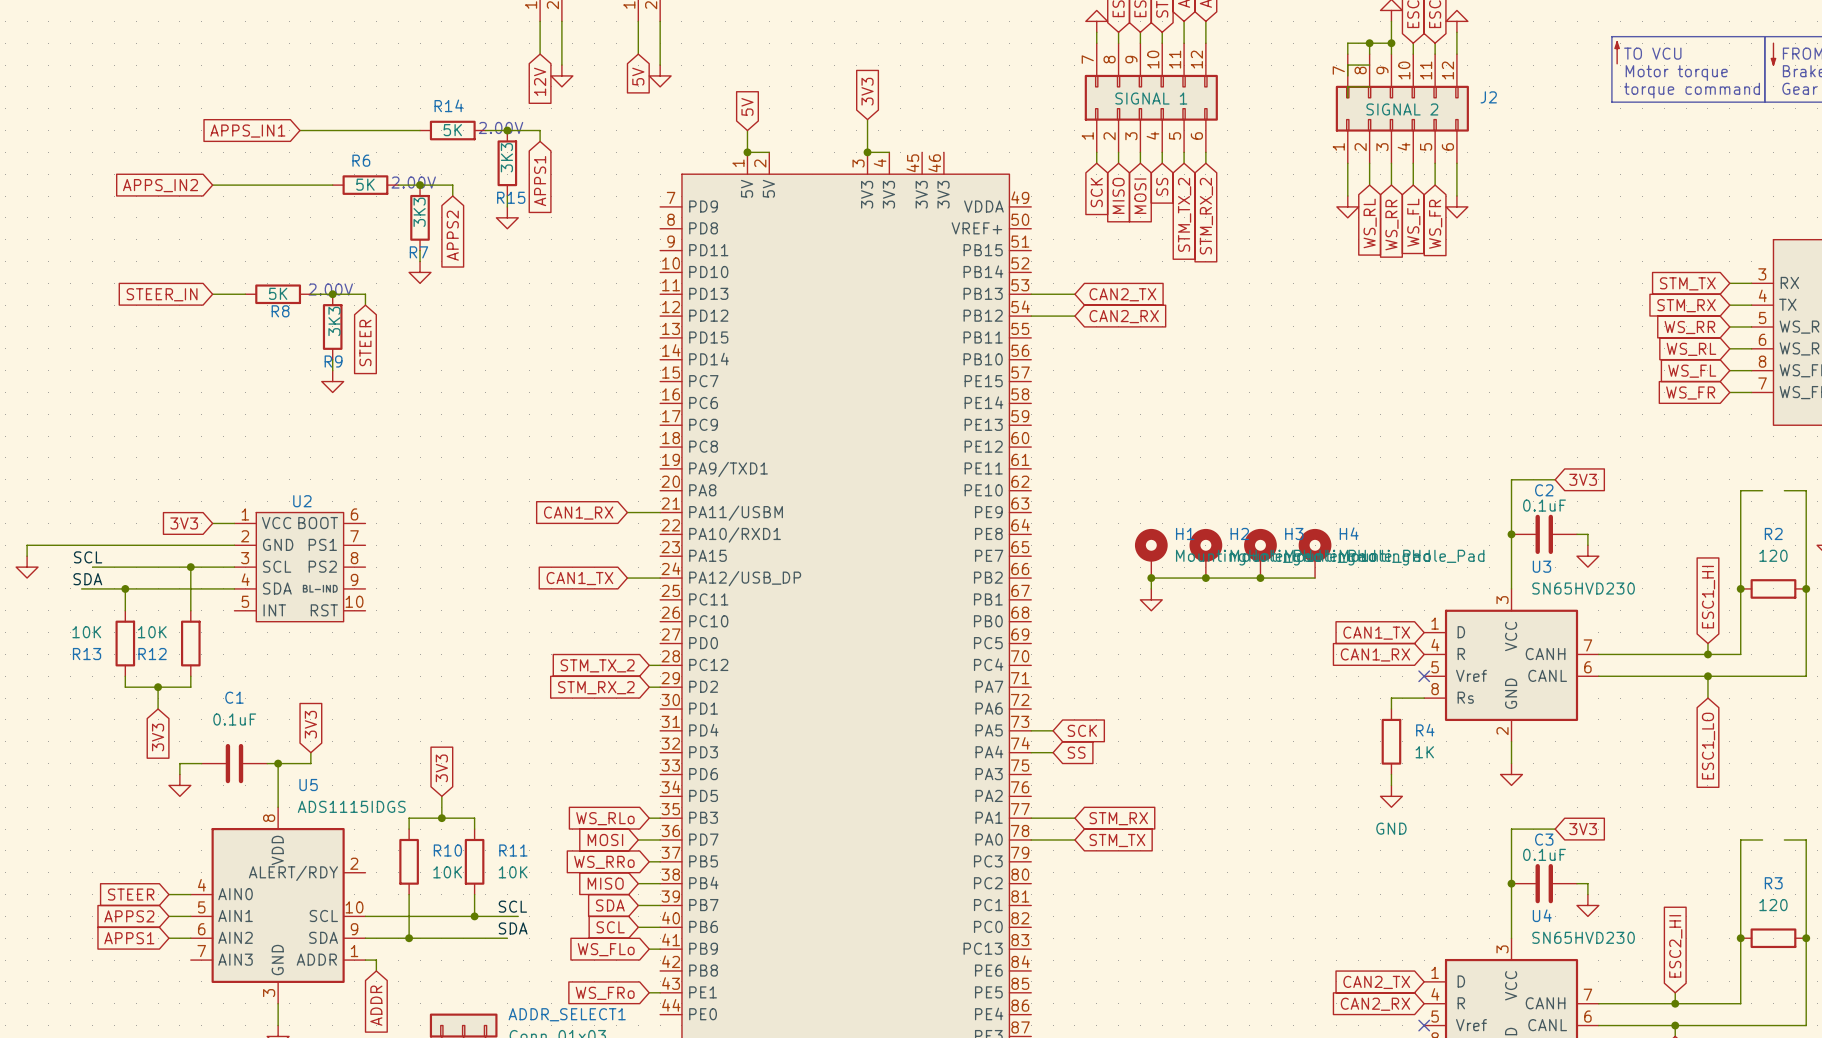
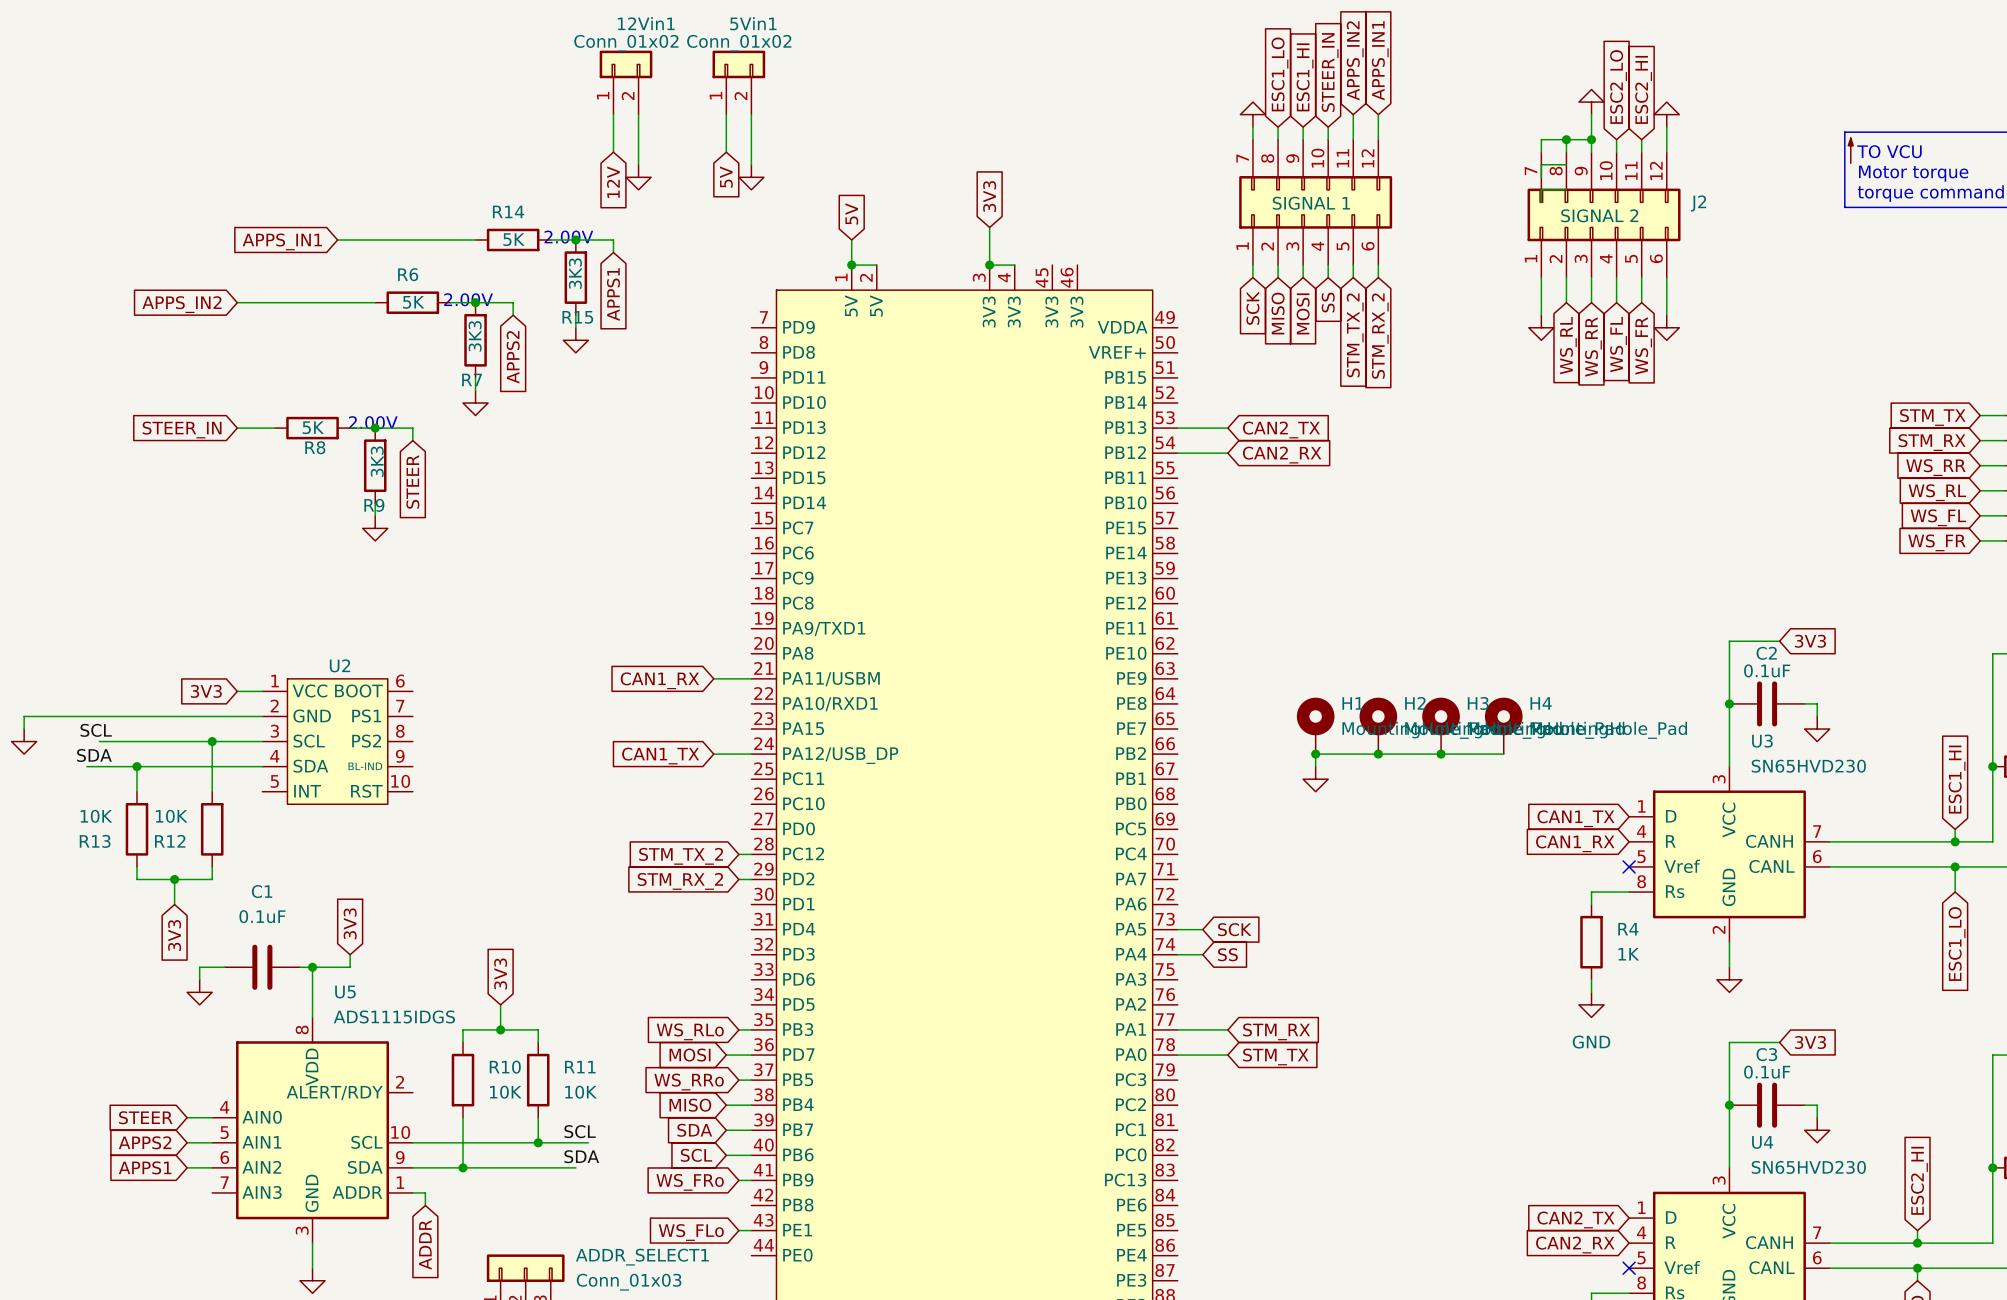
global label: WS_FLo (606, 949) -> WS_FRo (690, 1182)
global label: WS_FRo (605, 993) -> WS_FLo (691, 1232)

